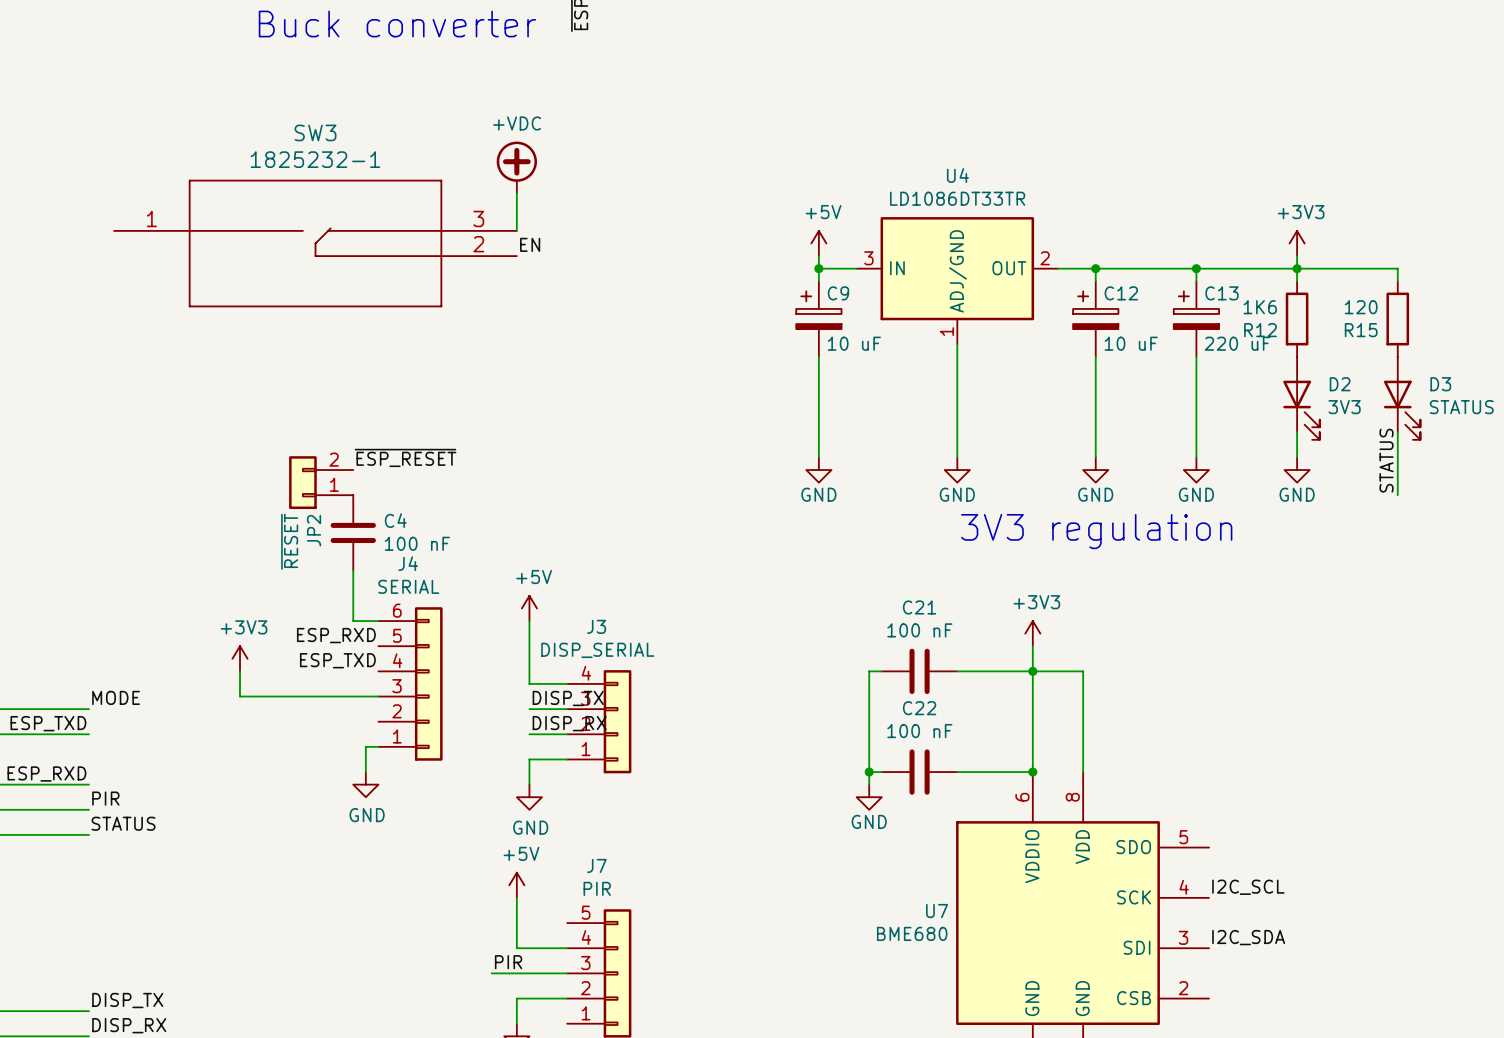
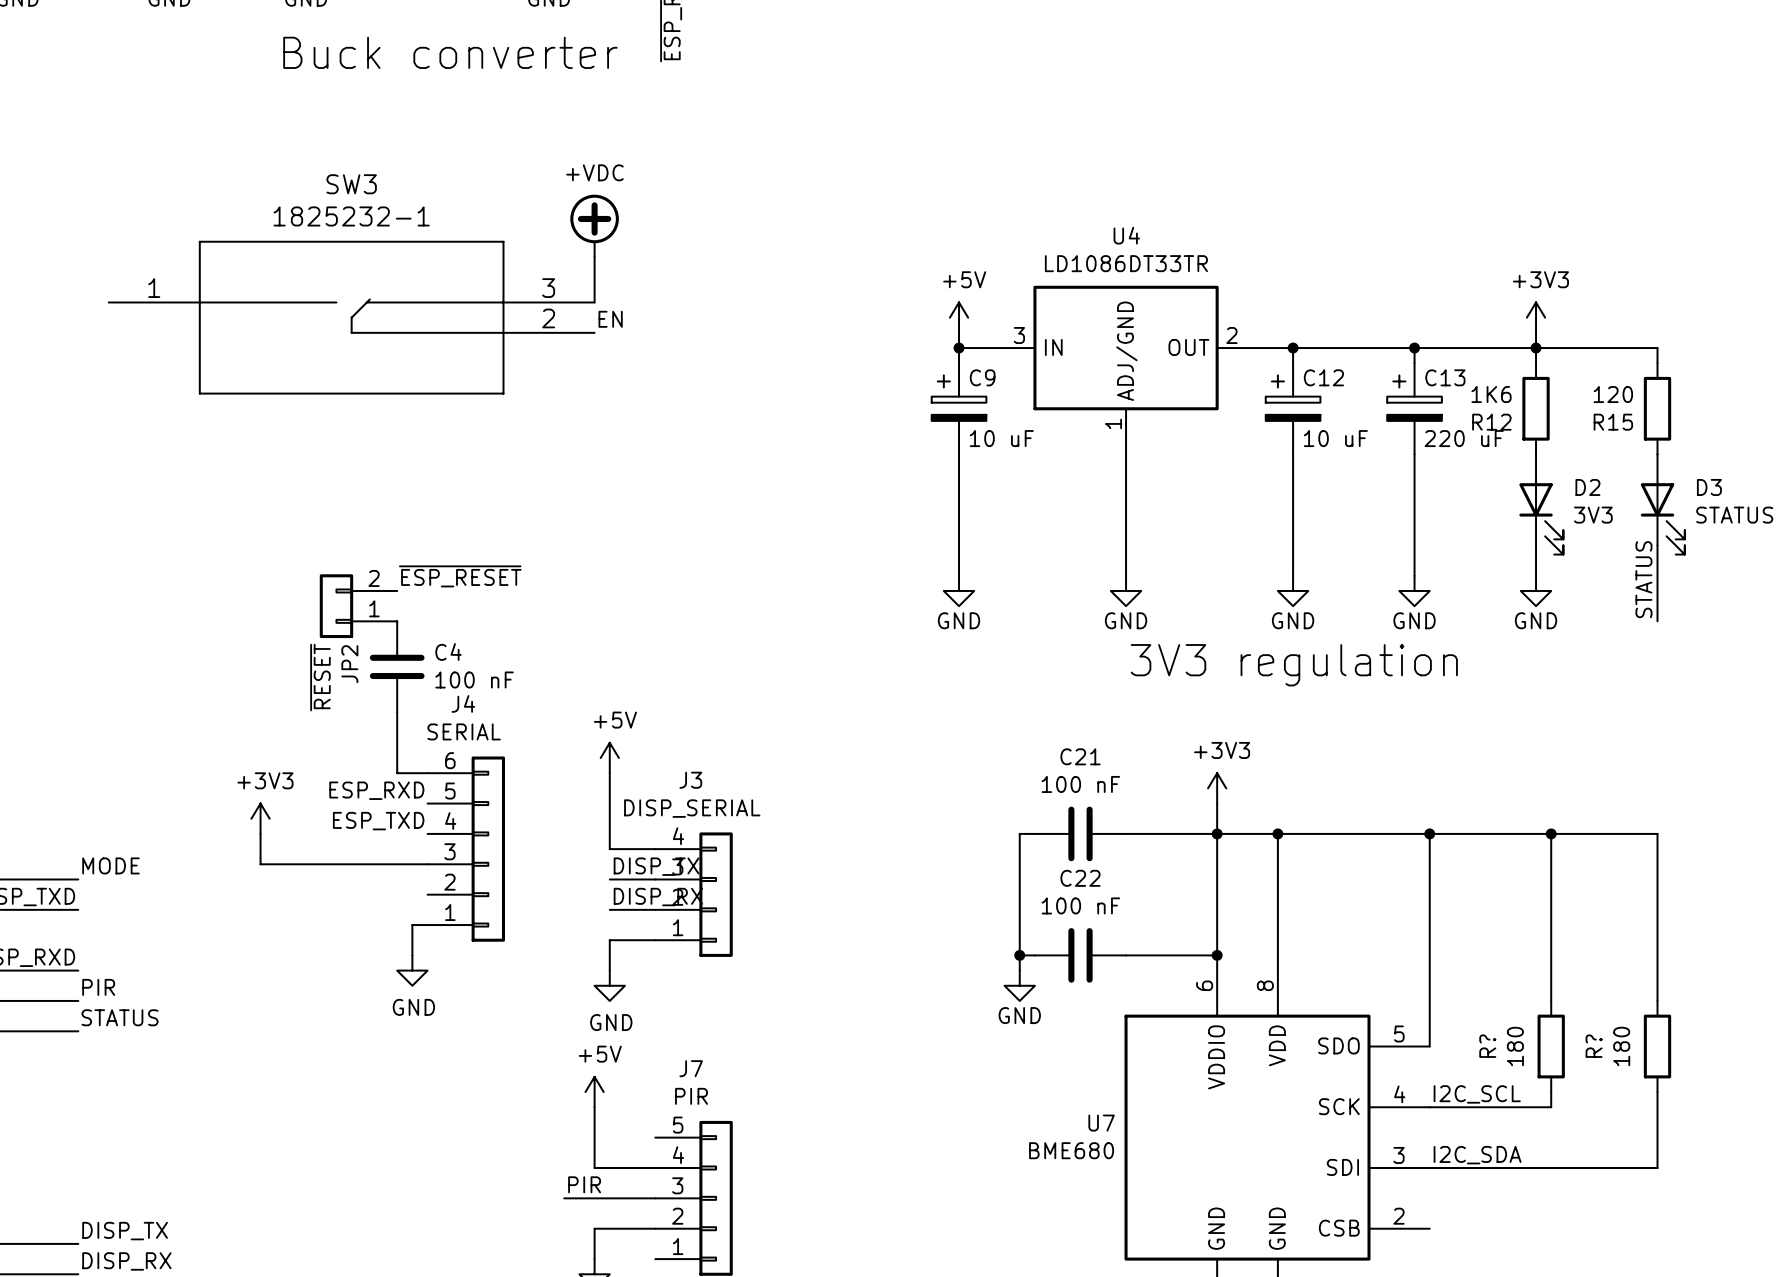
wire: none -> (1277, 833) (1657, 833) (1657, 1000)
junction: none -> (1277, 833)
wire: none -> (1429, 833) (1429, 1046)
junction: none -> (1429, 833)
wire: none -> (1551, 833) (1551, 1000)
junction: none -> (1551, 833)
R?: none -> 180 (1551, 1046)
R?: none -> 180 (1657, 1046)
wire: none -> (1551, 1092) (1551, 1107) (1429, 1107)
wire: none -> (1657, 1092) (1657, 1167) (1429, 1167)

